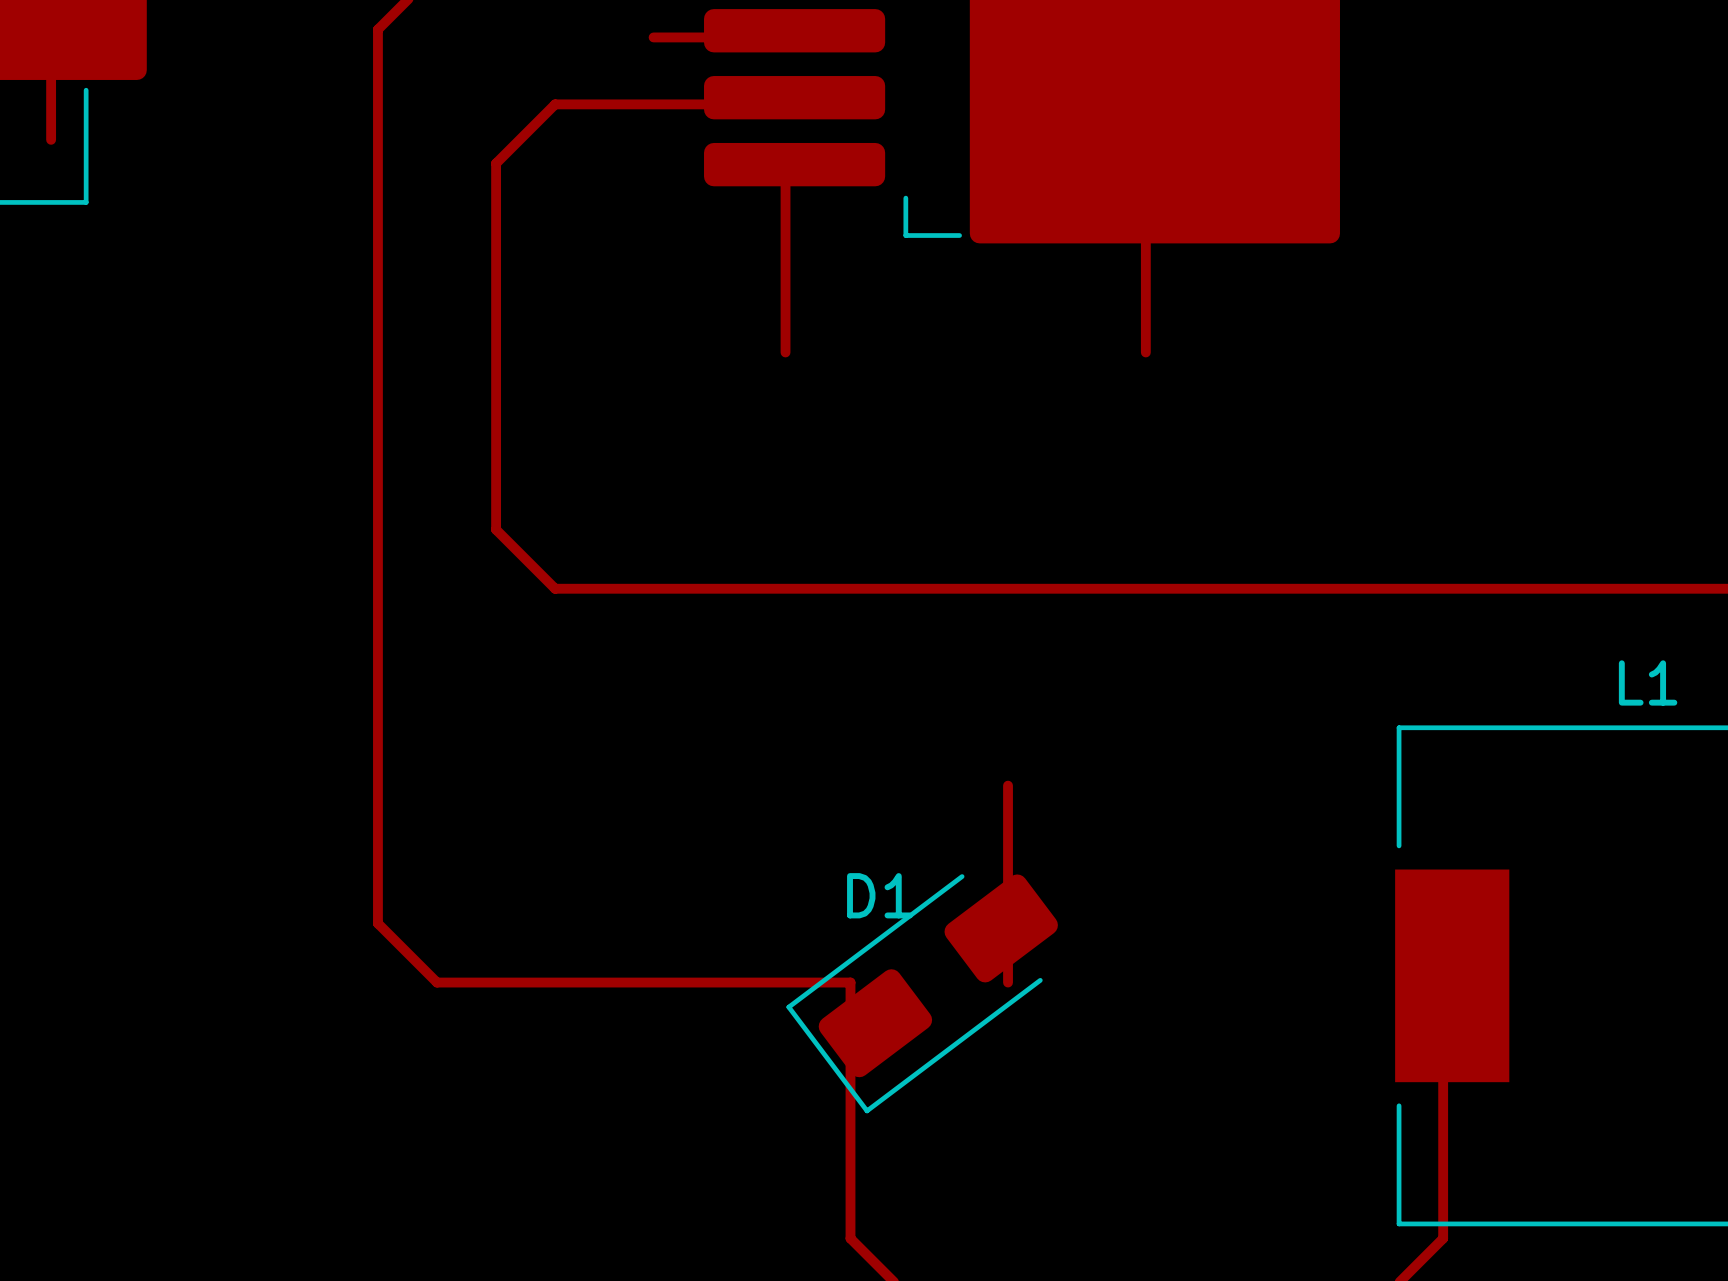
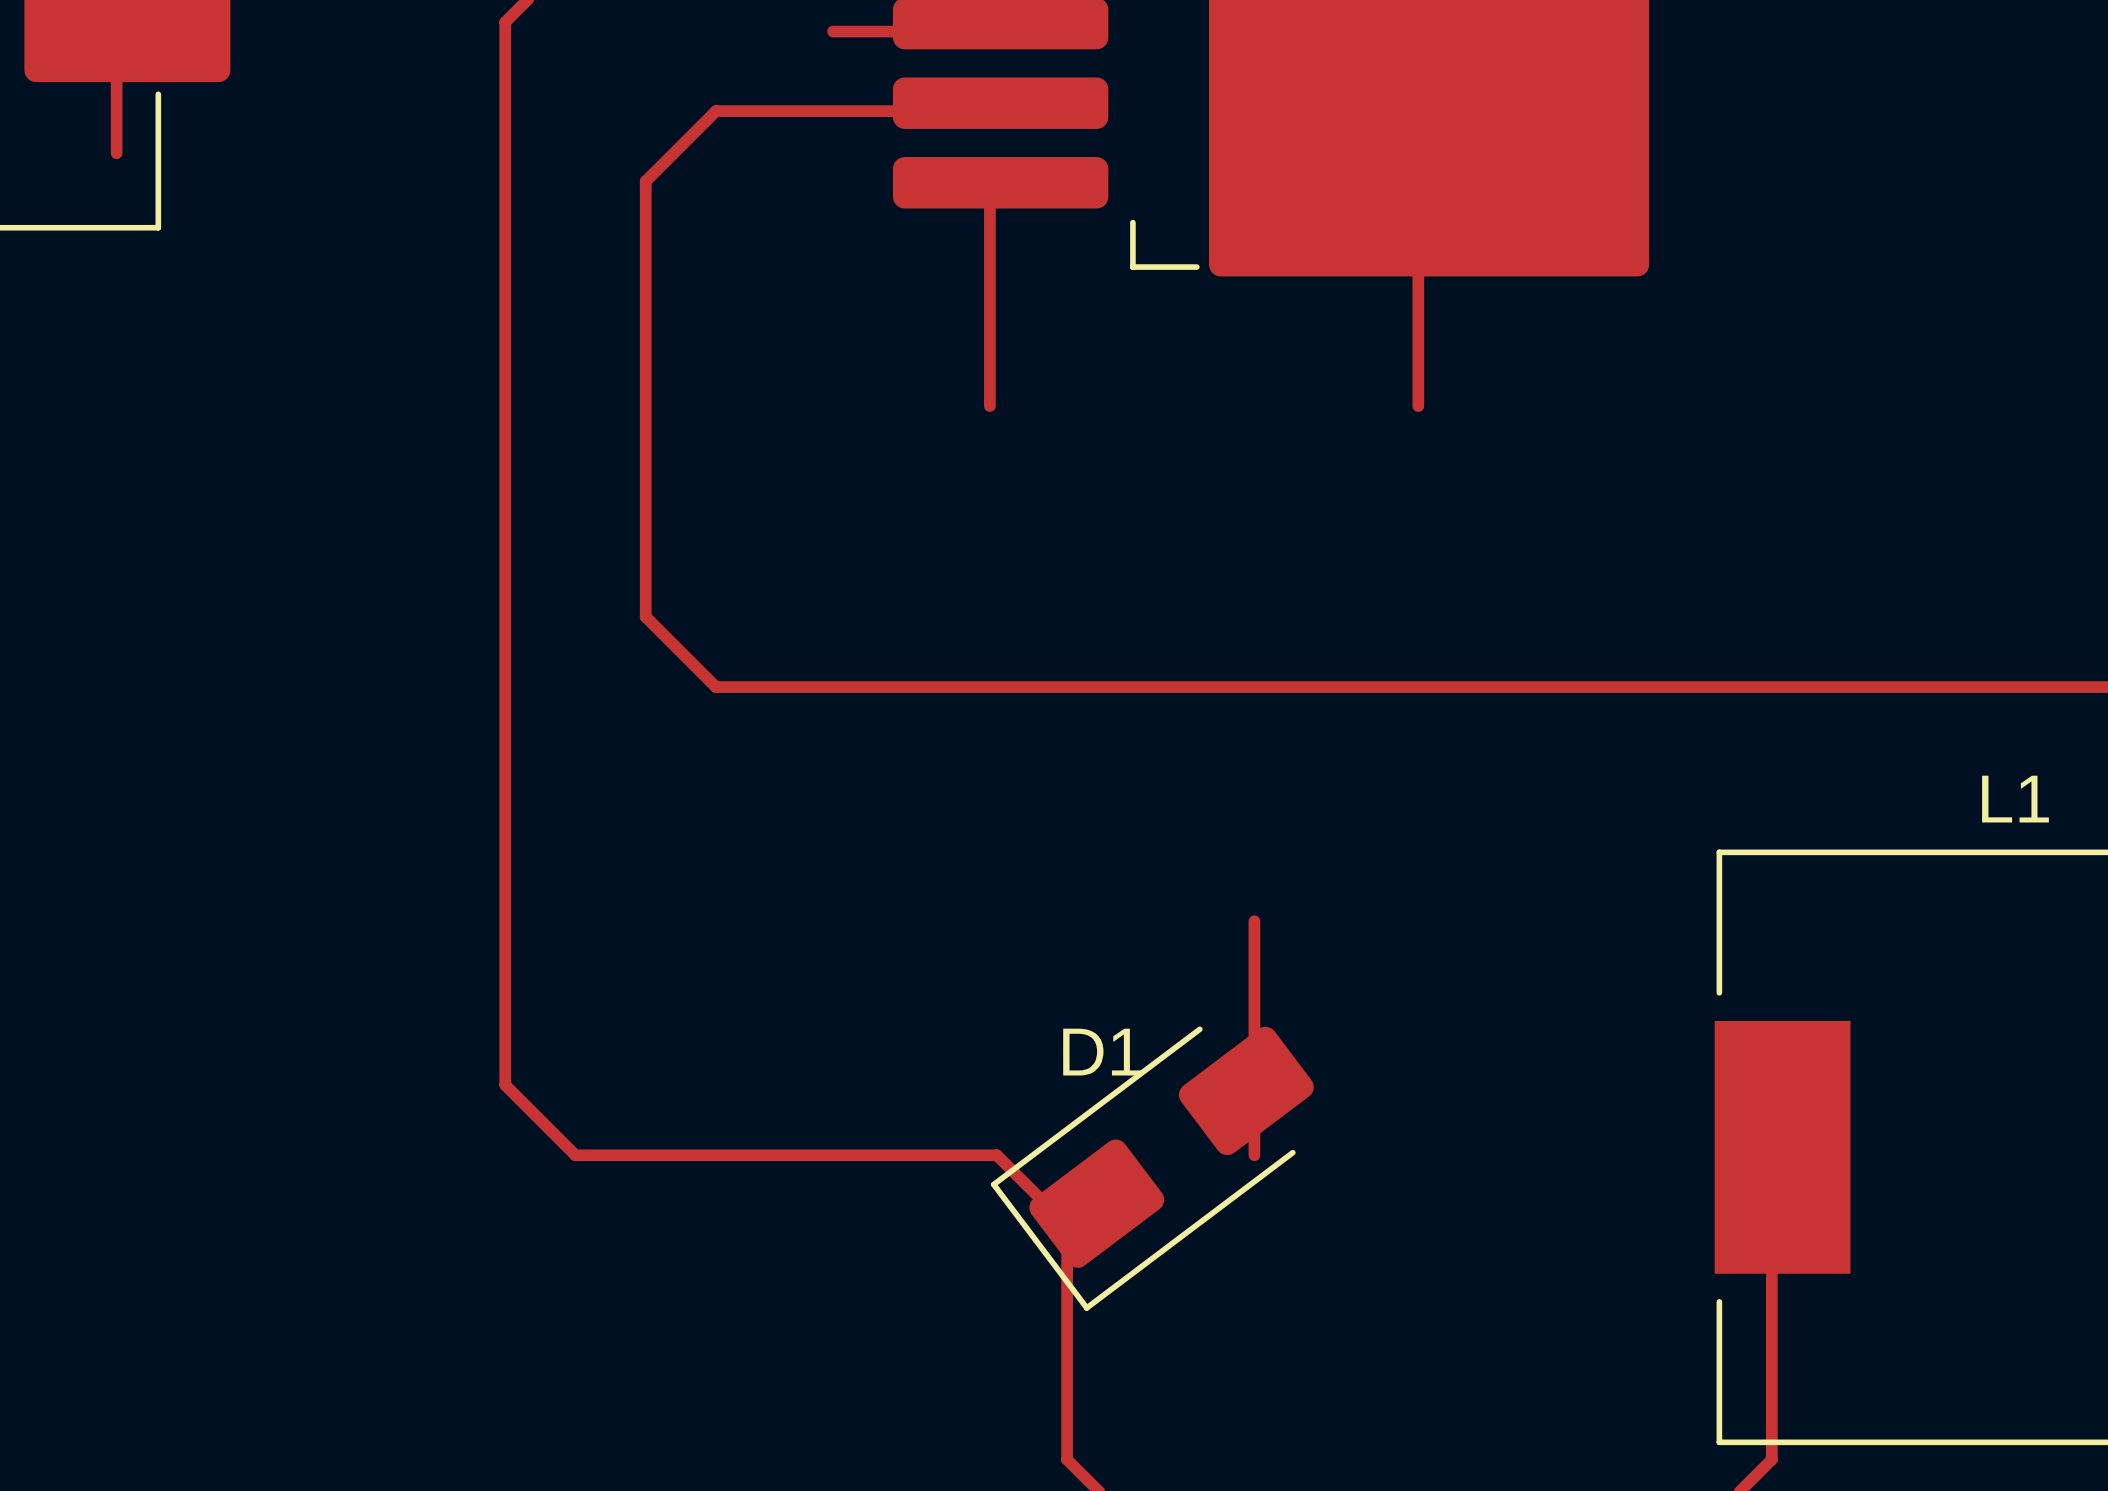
track: (791, 982) (850, 982) (850, 1041) -> (996, 1155) (1067, 1225)

